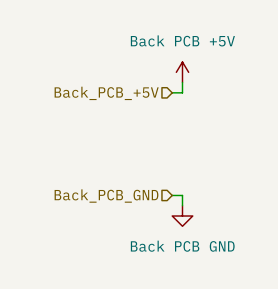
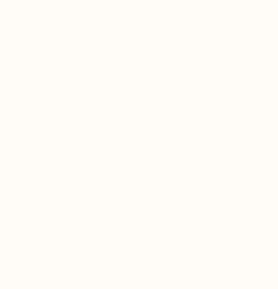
power symbol: Back PCB +5V (182, 72) -> none
wire: (182, 82) (182, 92) (172, 92) -> none
hierarchical label: Back_PCB_+5V (106, 93) -> none
wire: (172, 195) (182, 195) (182, 205) -> none
hierarchical label: Back_PCB_GND (106, 196) -> none
power symbol: Back PCB GND (182, 216) -> none

